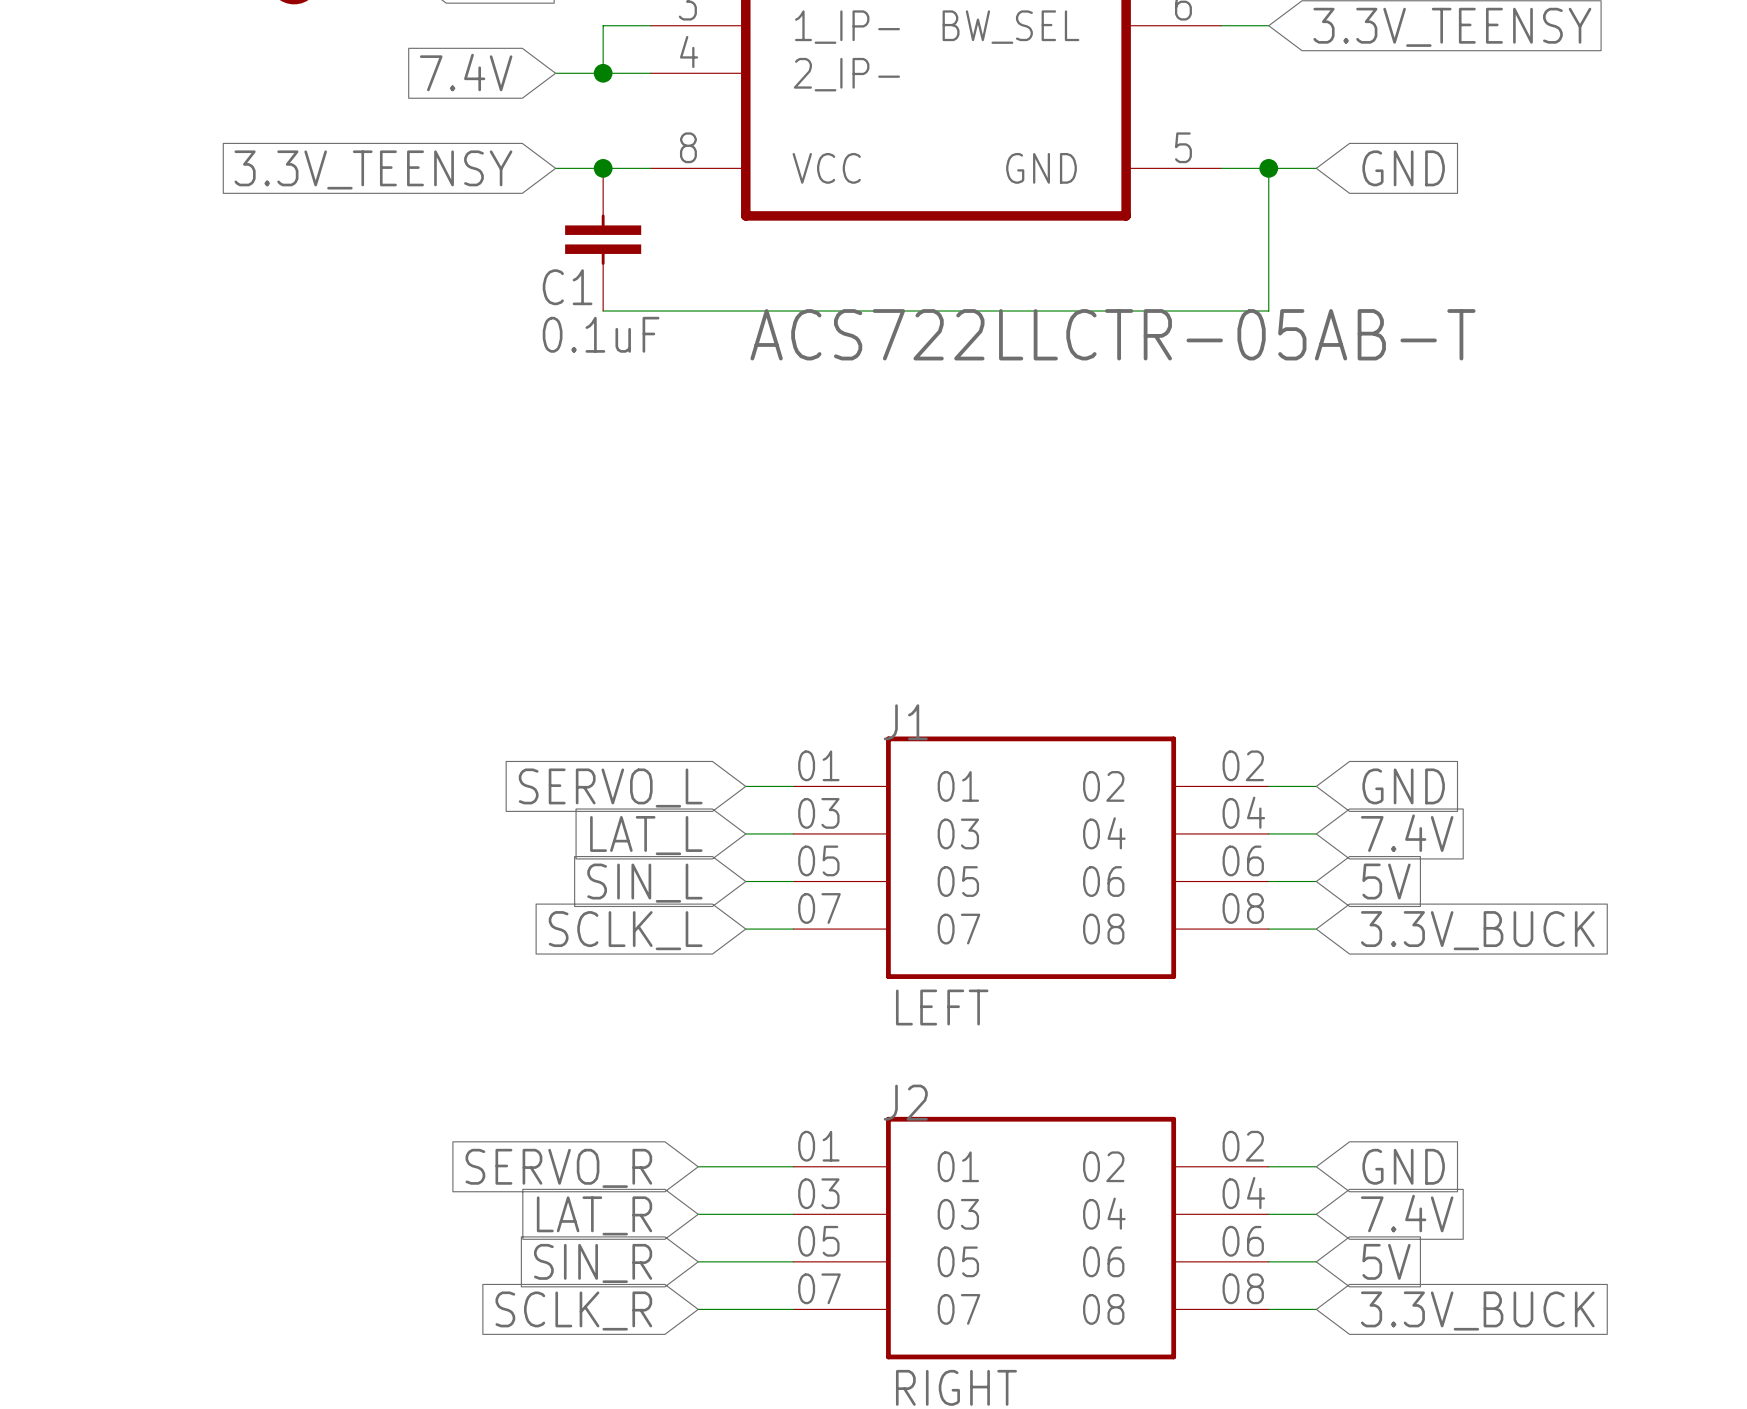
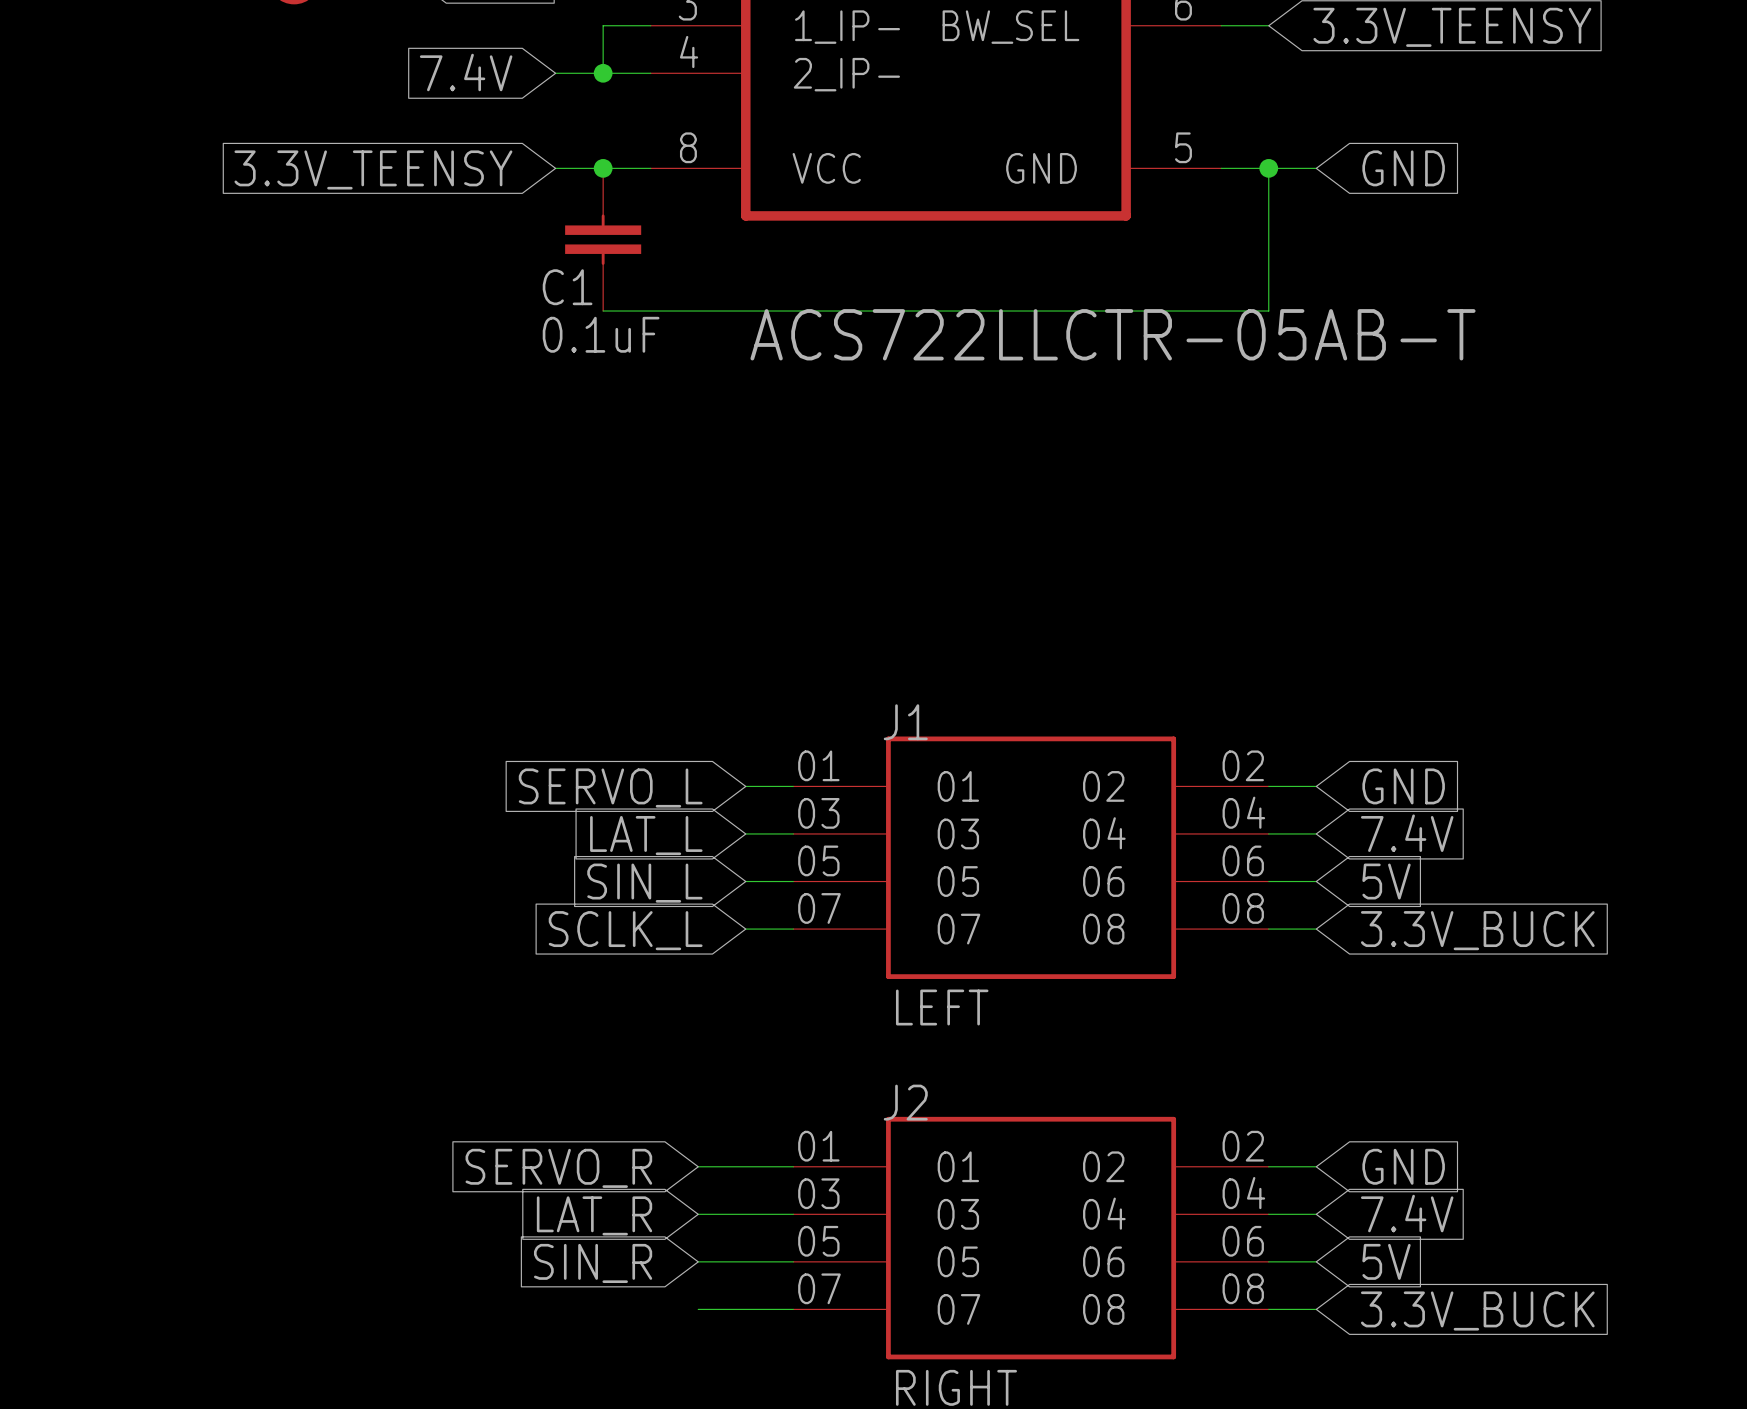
global label: SCLK_R (573, 1310) -> none

